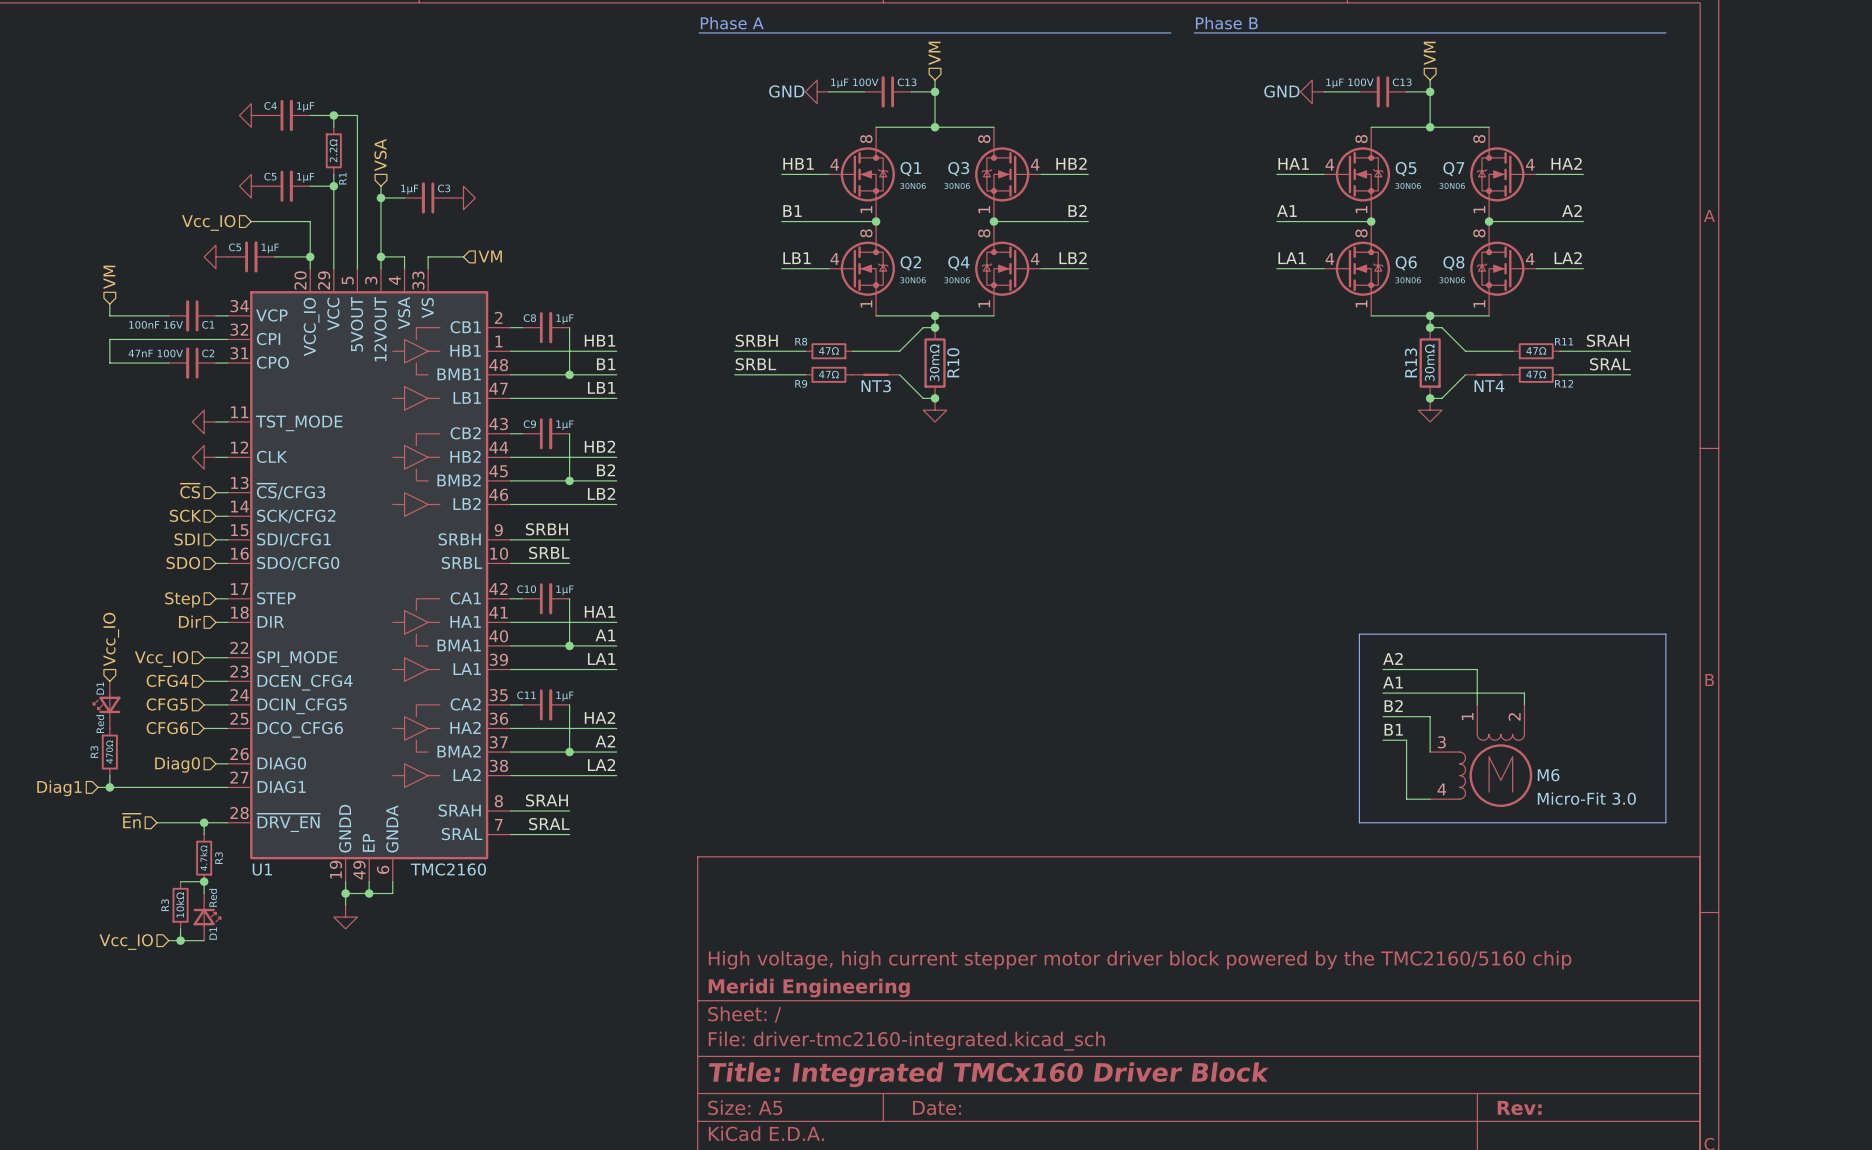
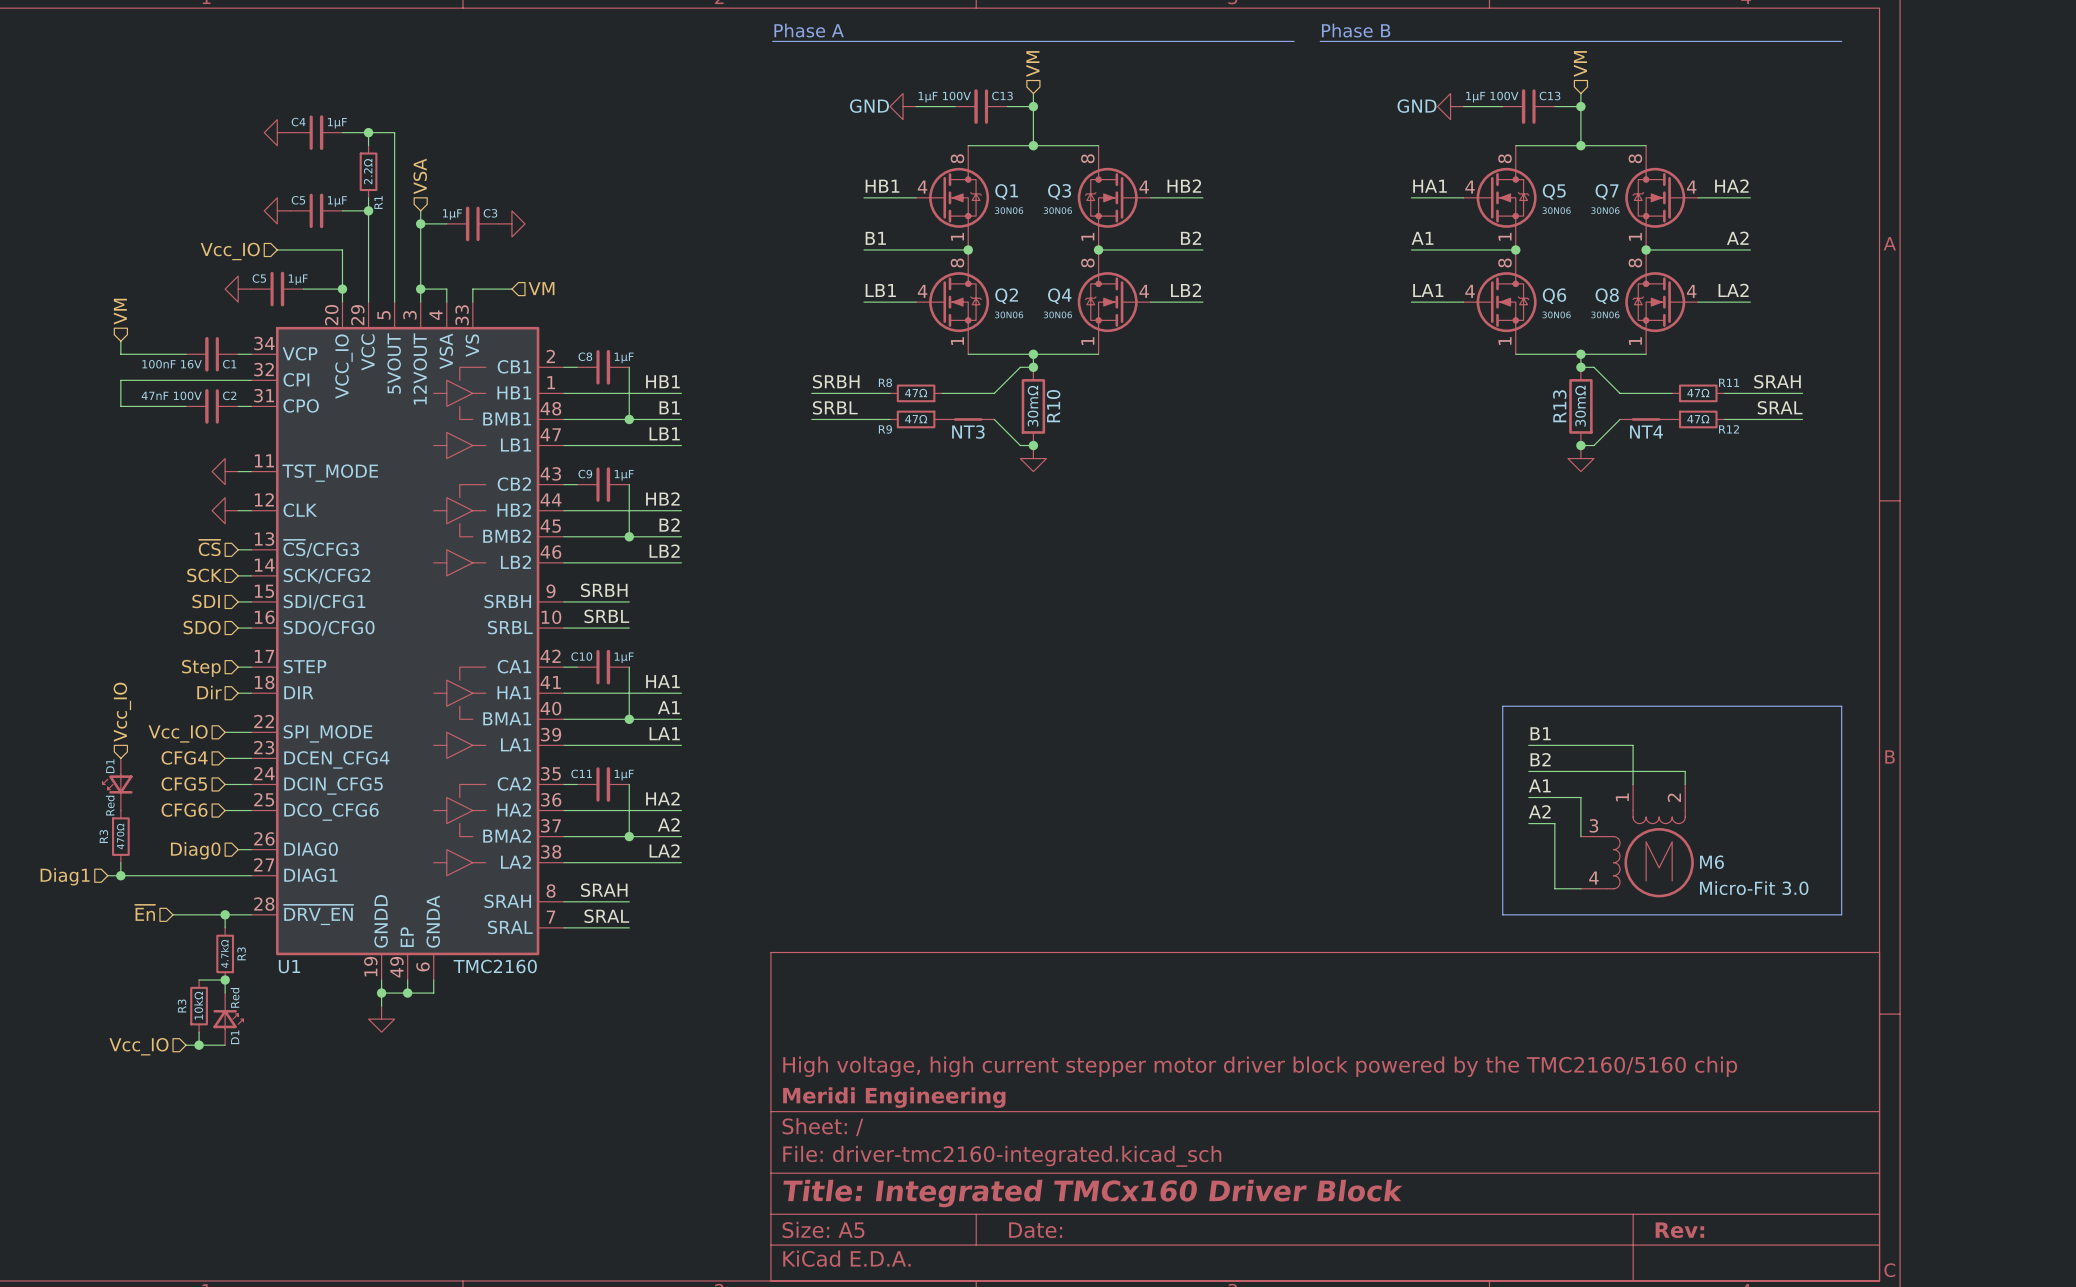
label: A2 (1392, 658) -> B1 (1540, 733)
label: A1 (1392, 682) -> B2 (1540, 759)
label: B2 (1393, 706) -> A1 (1539, 785)
label: B1 (1393, 729) -> A2 (1539, 811)

